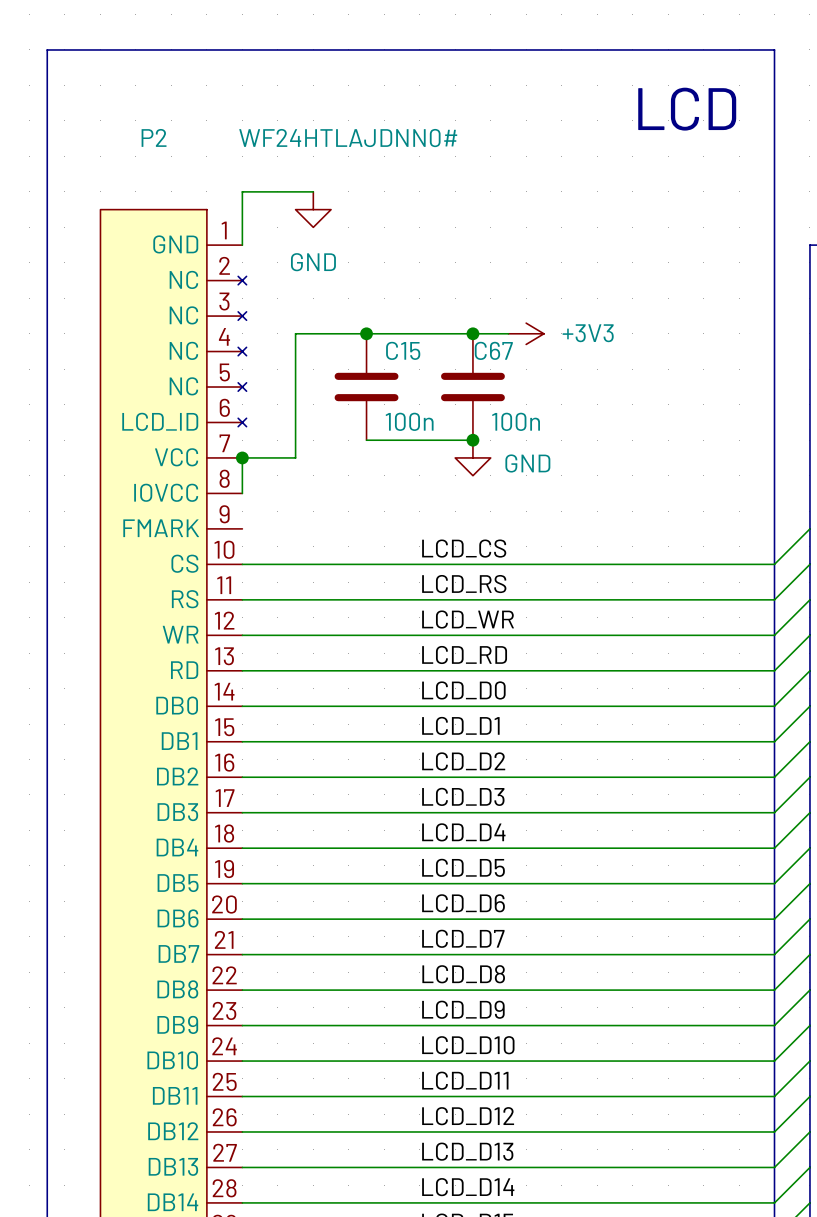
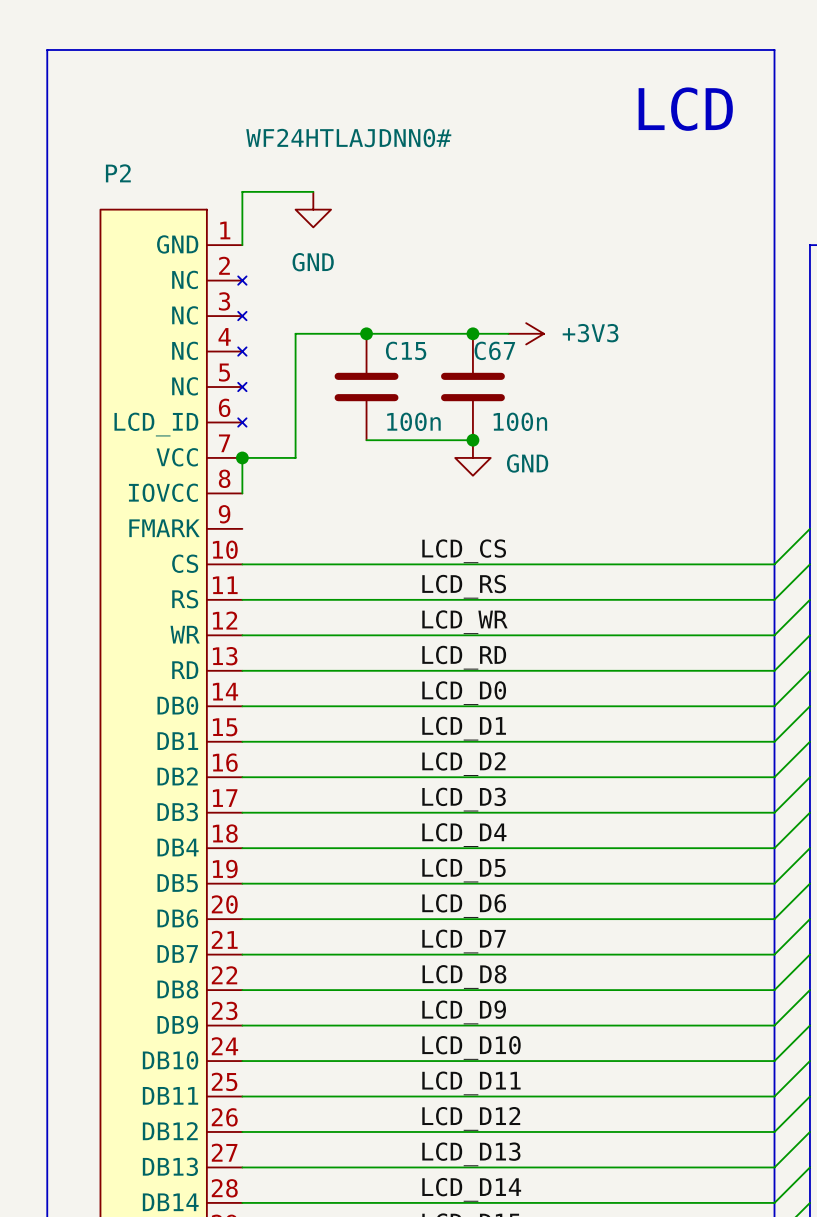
P2 name position: P2 (154, 137) -> P2 (118, 173)

